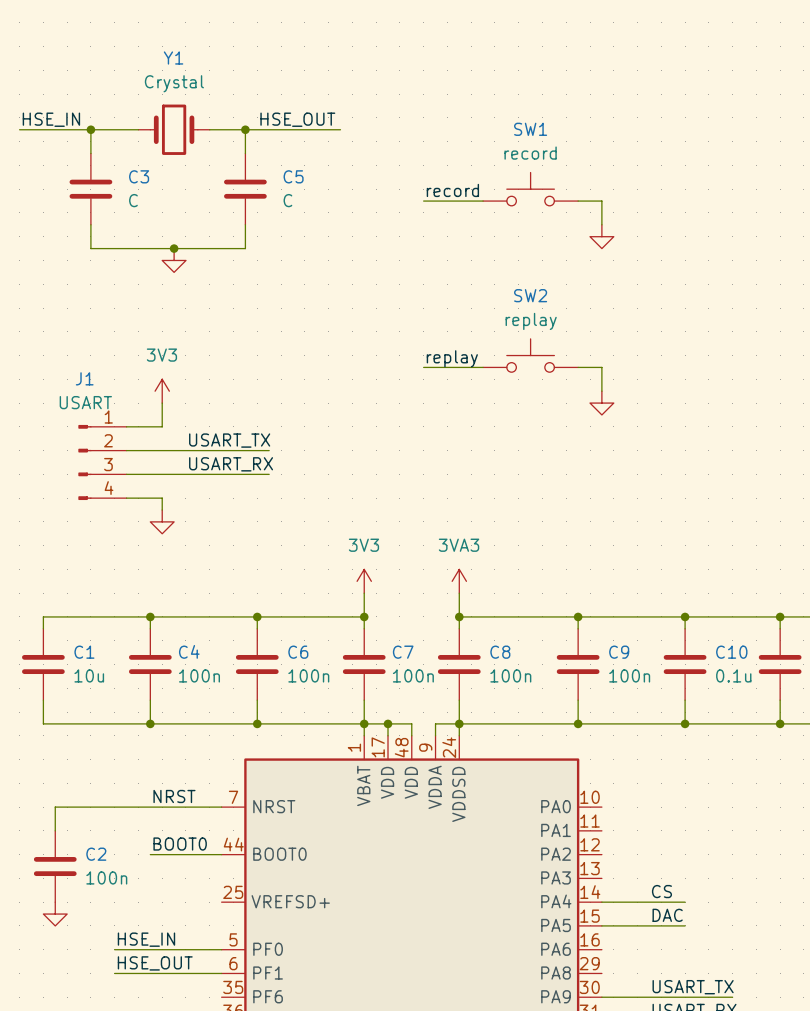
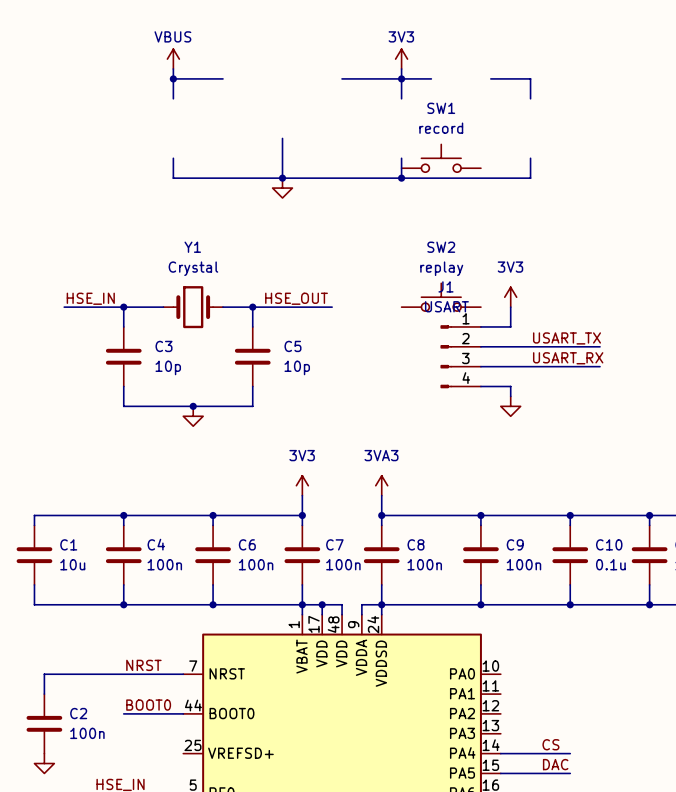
power symbol: none -> VBUS (173, 59)
power symbol: none -> 3V3 (401, 59)
wire: none -> (173, 69) (173, 98)
wire: none -> (401, 69) (401, 98)
wire: none -> (173, 78) (222, 78)
wire: none -> (342, 78) (431, 78)
junction: none -> (401, 78)
wire: none -> (490, 78) (530, 78) (530, 98)
label: HSE_IN (51, 119) -> none
label: HSE_OUT (297, 119) -> none
wire: (19, 129) (138, 129) -> none
wire: (90, 129) (90, 153) -> none
junction: (90, 129) -> none
Y1 position: (174, 129) -> (193, 307)
wire: (209, 129) (340, 129) -> none
wire: (245, 129) (245, 153) -> none
junction position: (245, 129) -> (173, 78)
wire: none -> (282, 138) (282, 178)
C3 position: (90, 189) -> (123, 356)
wire: none -> (173, 158) (173, 178) (530, 178) (530, 158)
C5 position: (245, 189) -> (252, 356)
wire: none -> (401, 158) (401, 178)
label: record (452, 190) -> none
C3 value: C (133, 200) -> 10p (168, 367)
C5 value: C (287, 200) -> 10p (297, 367)
wire: (423, 201) (483, 201) -> none
wire: (578, 201) (601, 201) (601, 224) -> none
junction: none -> (282, 178)
junction: none -> (401, 178)
wire: (90, 224) (90, 248) (245, 248) (245, 224) -> none
power symbol: none -> (282, 188)
power symbol: (601, 236) -> none
junction: (174, 248) -> none
power symbol: (174, 260) -> none
power symbol: none -> 3V3 (510, 297)
label: none -> HSE_IN (90, 298)
label: none -> HSE_OUT (296, 298)
label: replay (452, 358) -> none
wire: none -> (64, 307) (163, 307)
wire: none -> (123, 307) (123, 326)
junction: none -> (123, 307)
wire: none -> (222, 307) (332, 307)
wire: none -> (252, 307) (252, 326)
junction: none -> (252, 307)
wire: (423, 367) (483, 367) -> none
wire: (578, 367) (601, 367) (601, 391) -> none
wire: none -> (510, 307) (510, 326) (480, 326)
power symbol: 3V3 (162, 391) -> none
wire: (162, 403) (162, 426) (126, 426) -> none
power symbol position: (601, 403) -> (510, 406)
label: none -> USART_TX (567, 338)
wire: none -> (480, 346) (600, 346)
label: none -> USART_RX (568, 358)
wire: none -> (480, 366) (600, 366)
label: USART_TX (229, 440) -> none
wire: (126, 450) (269, 450) -> none
J1 position: (102, 462) -> (460, 356)
wire: none -> (123, 386) (123, 406) (252, 406) (252, 386)
wire: none -> (480, 386) (510, 386) (510, 396)
label: USART_RX (231, 464) -> none
wire: (126, 474) (269, 474) -> none
junction: none -> (193, 406)
wire: (126, 498) (162, 498) (162, 510) -> none
power symbol position: (162, 521) -> (193, 416)

